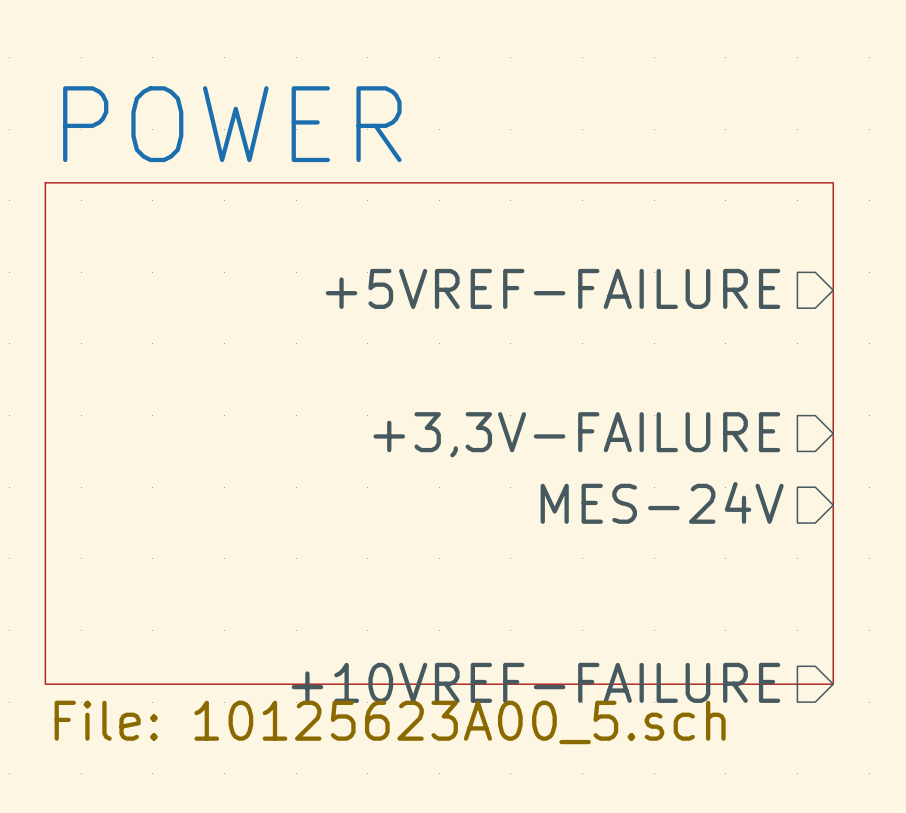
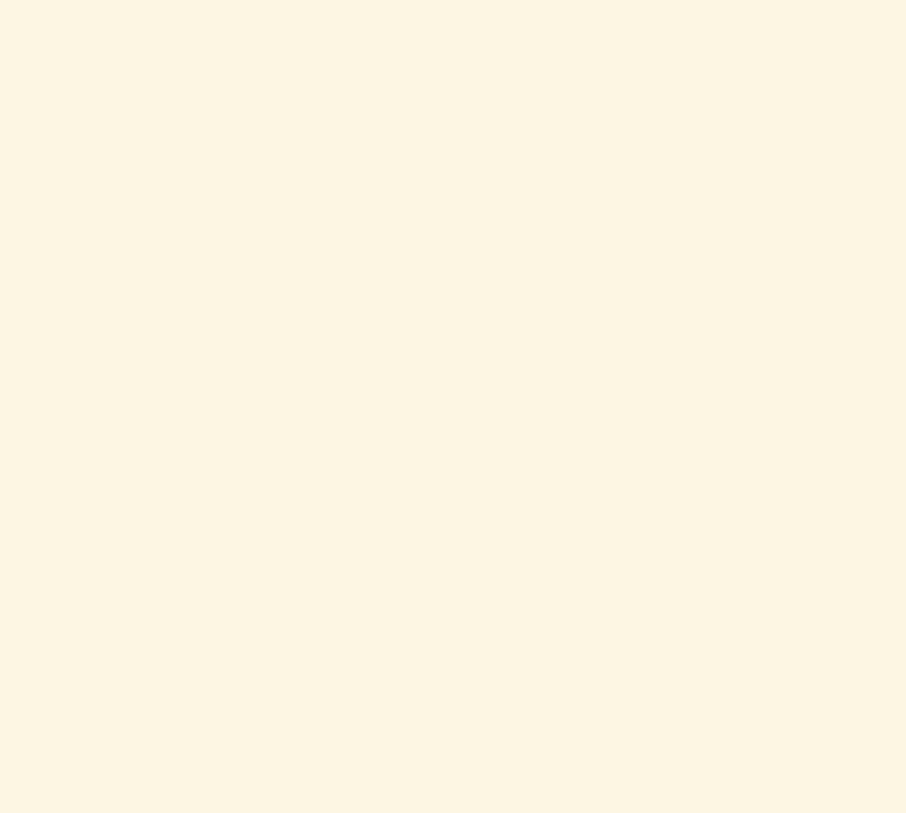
sheet pin: +5VREF-FAILURE (552, 288) -> none
sheet POWER: File: 10125623A00_5.sch (439, 433) -> none
sheet pin: +3,3V-FAILURE (576, 434) -> none
sheet pin: MES-24V (662, 502) -> none
sheet pin: +10VREF-FAILURE (535, 682) -> none

